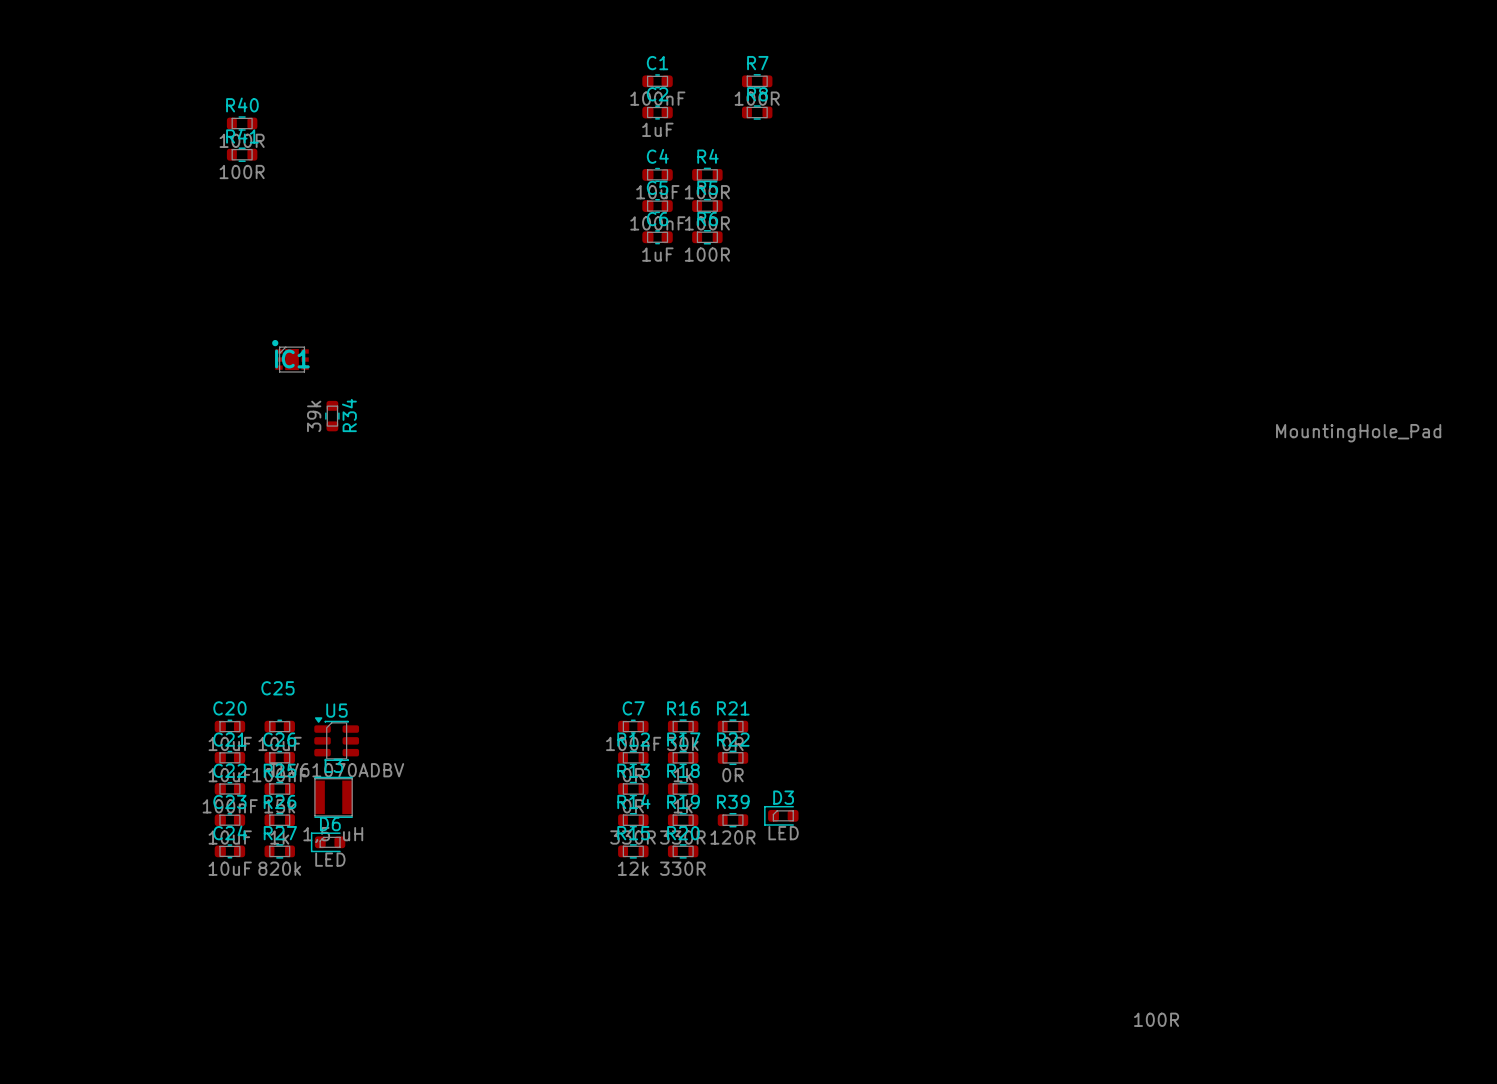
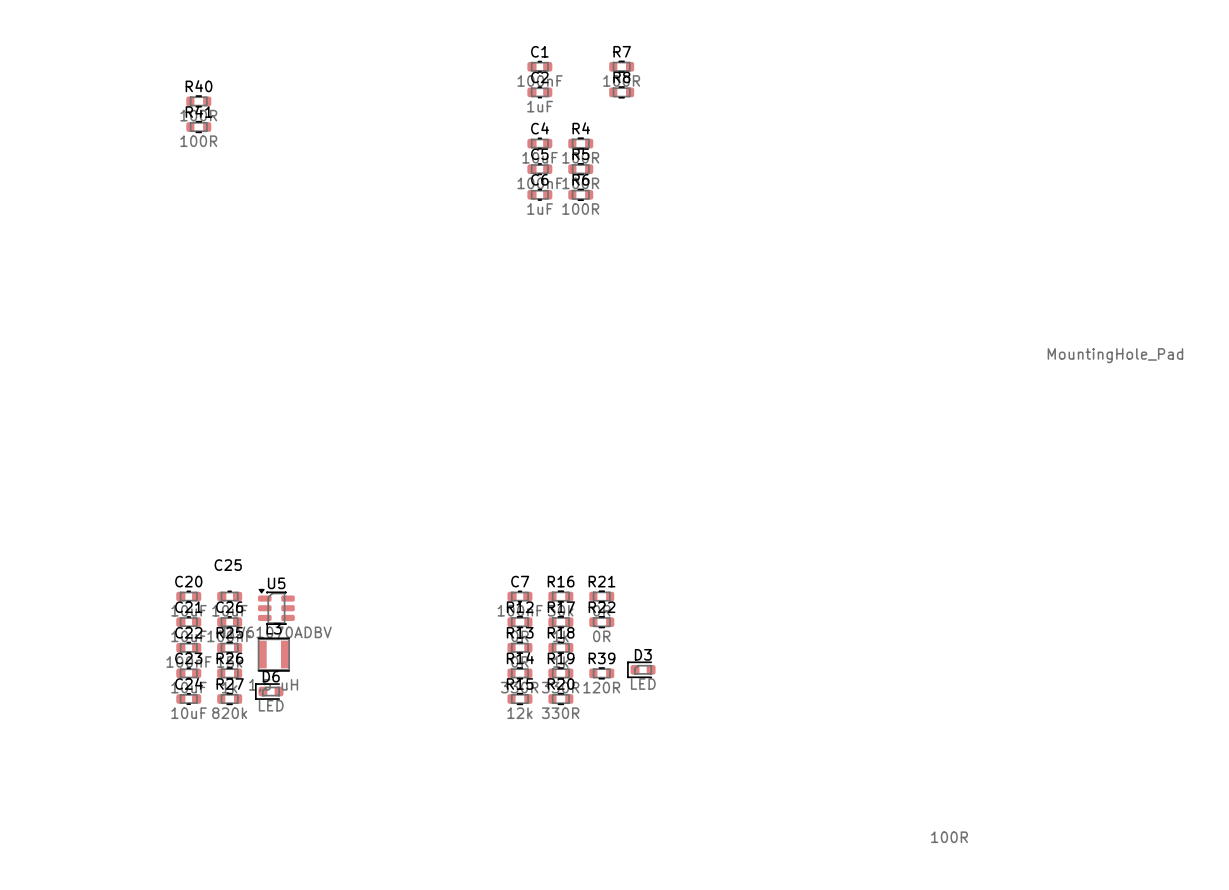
IC1: (290, 356) -> none
R34: 39k (332, 416) -> none

